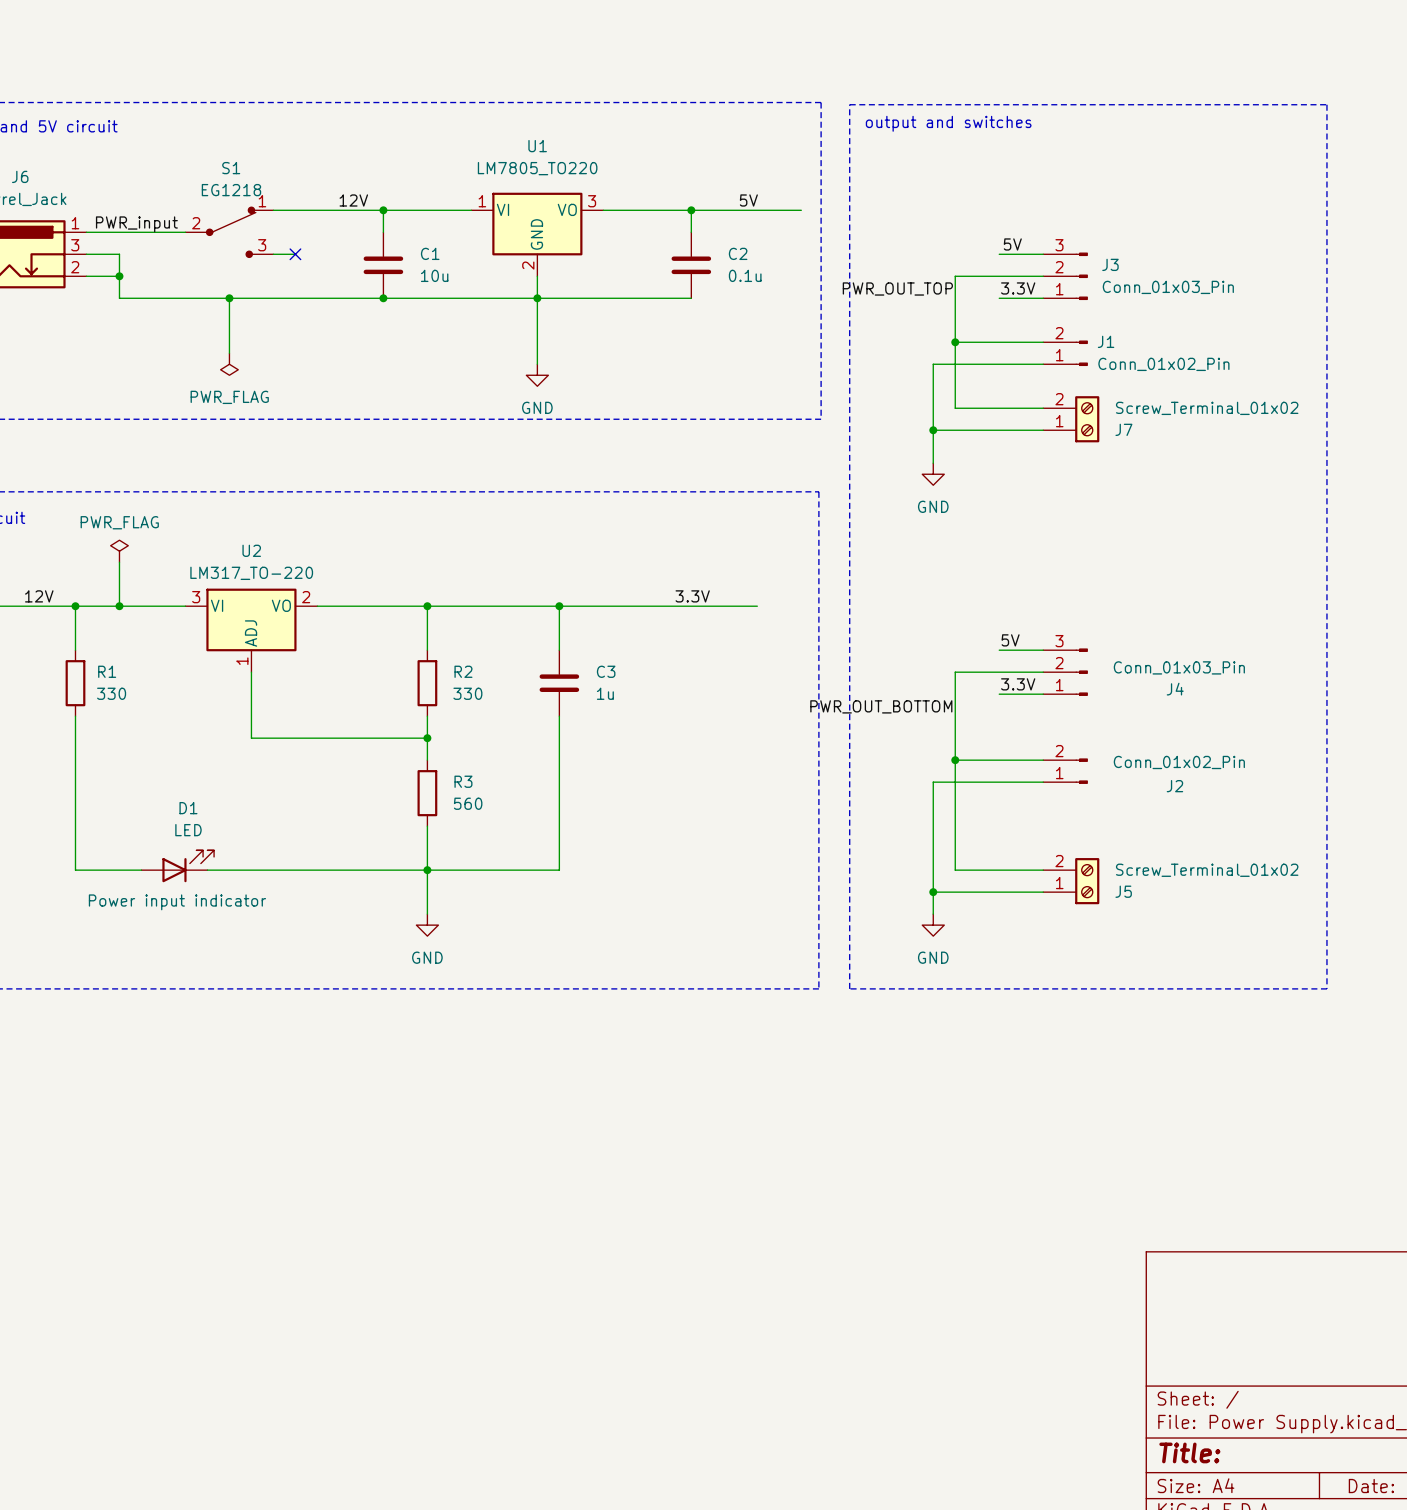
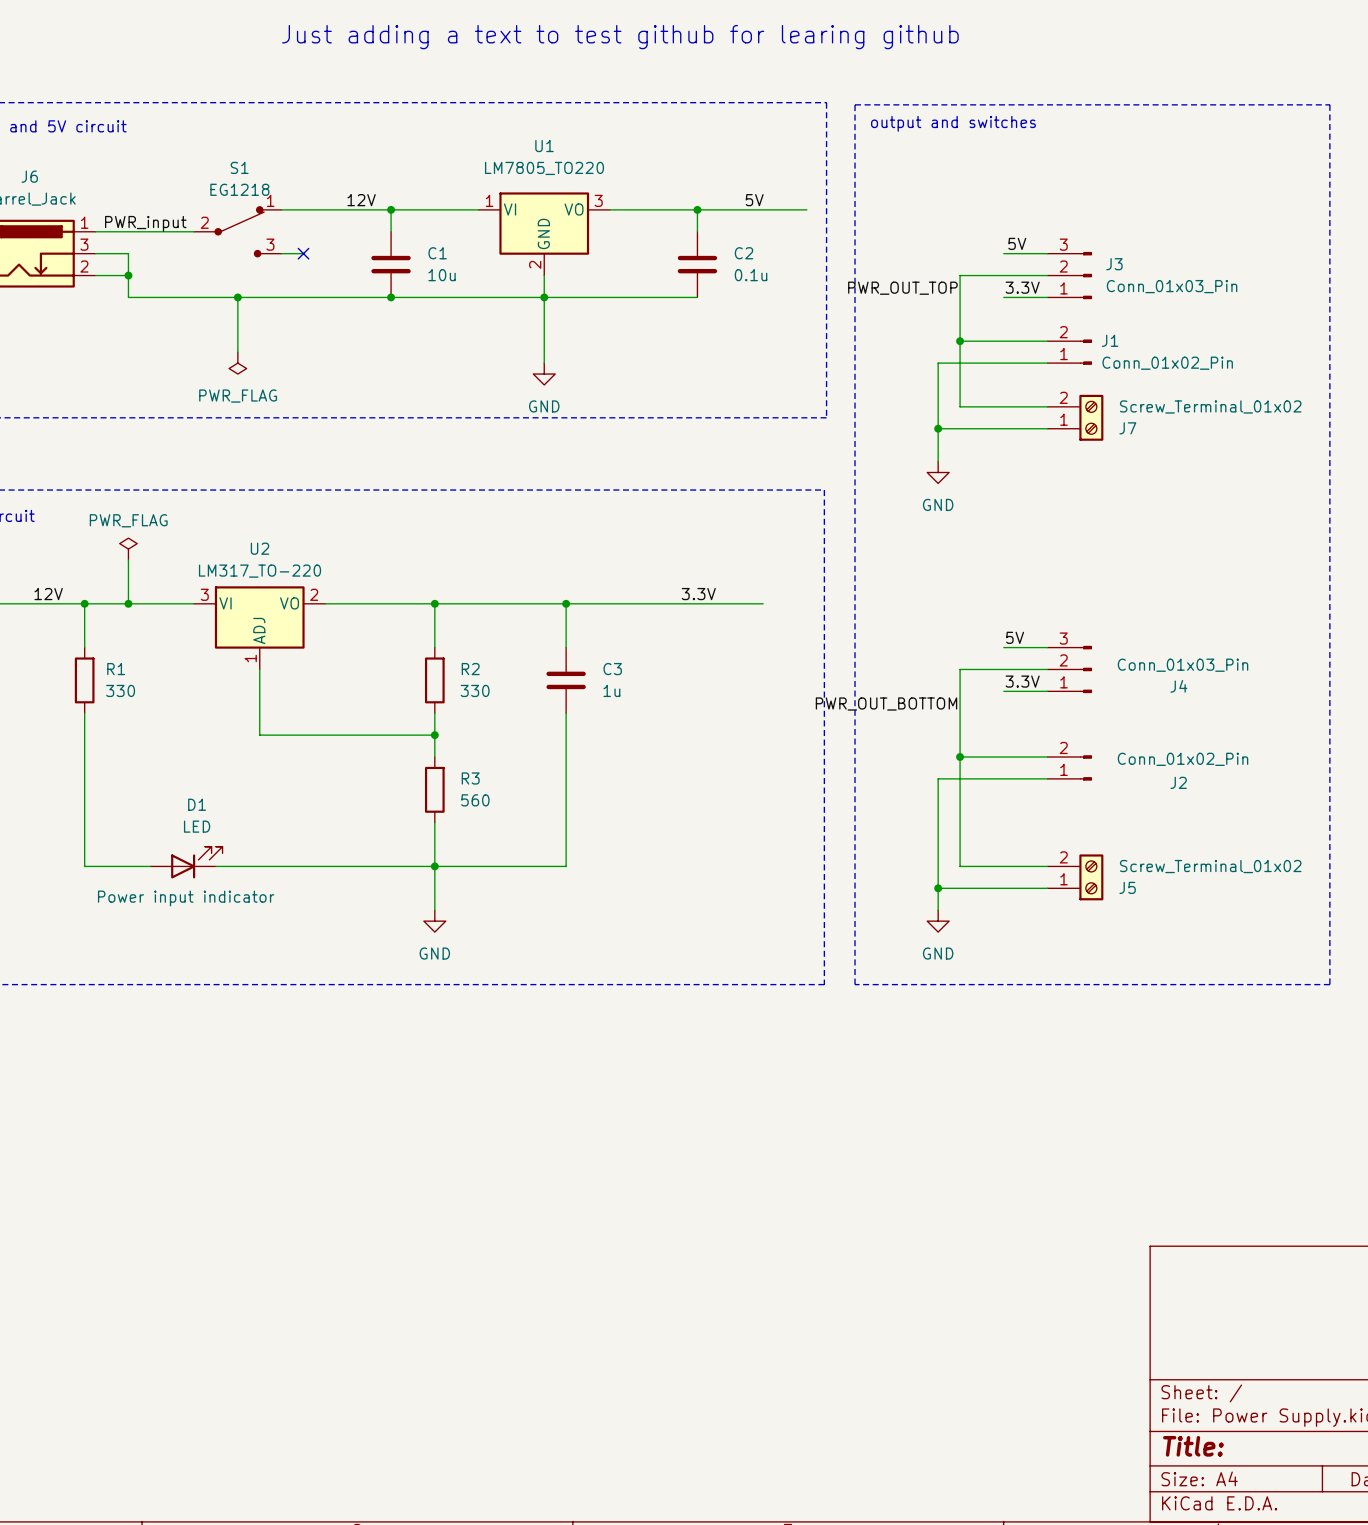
text: none -> Just adding a text to test github for learing github (620, 37)

